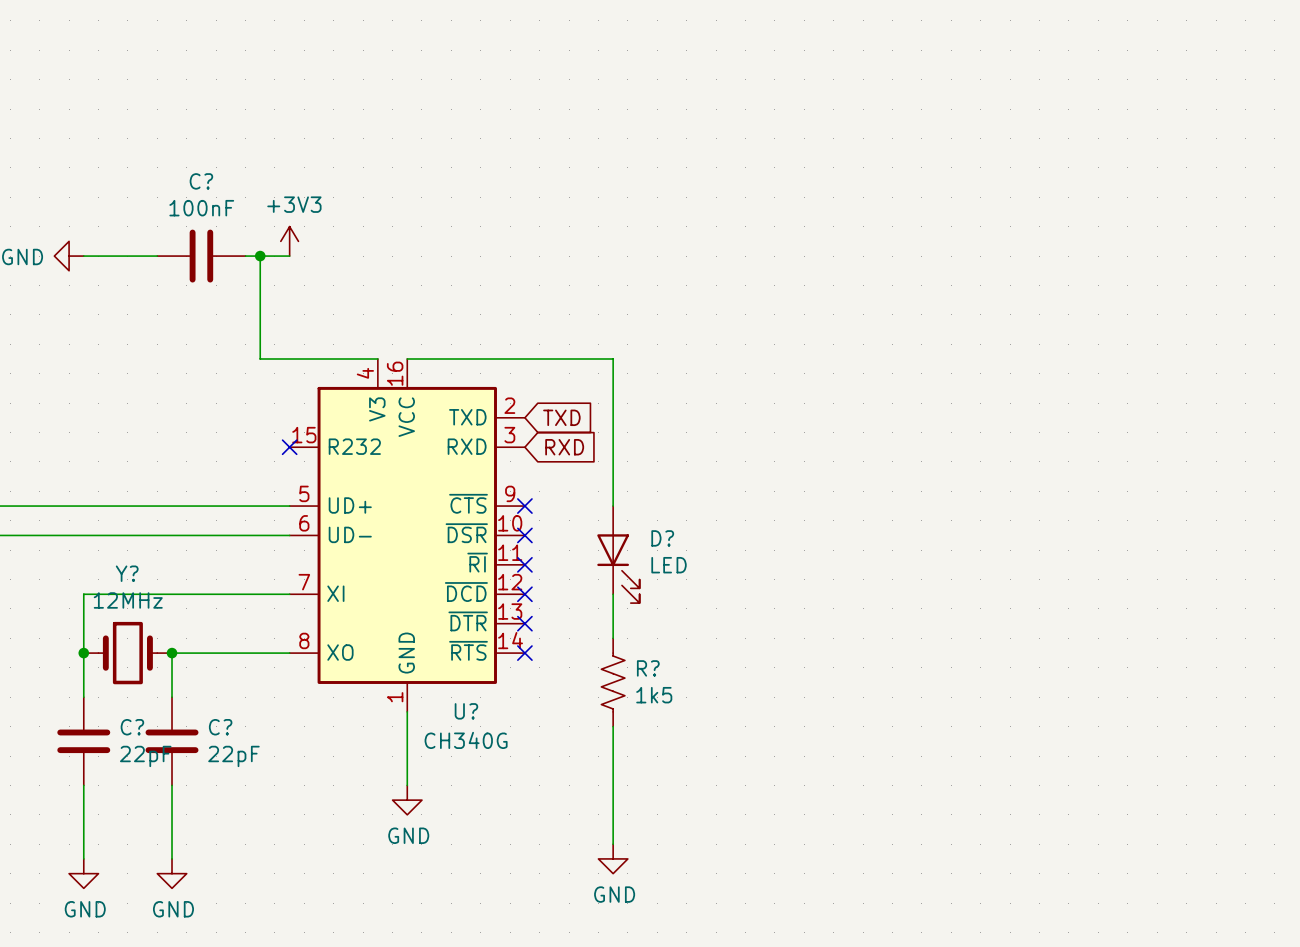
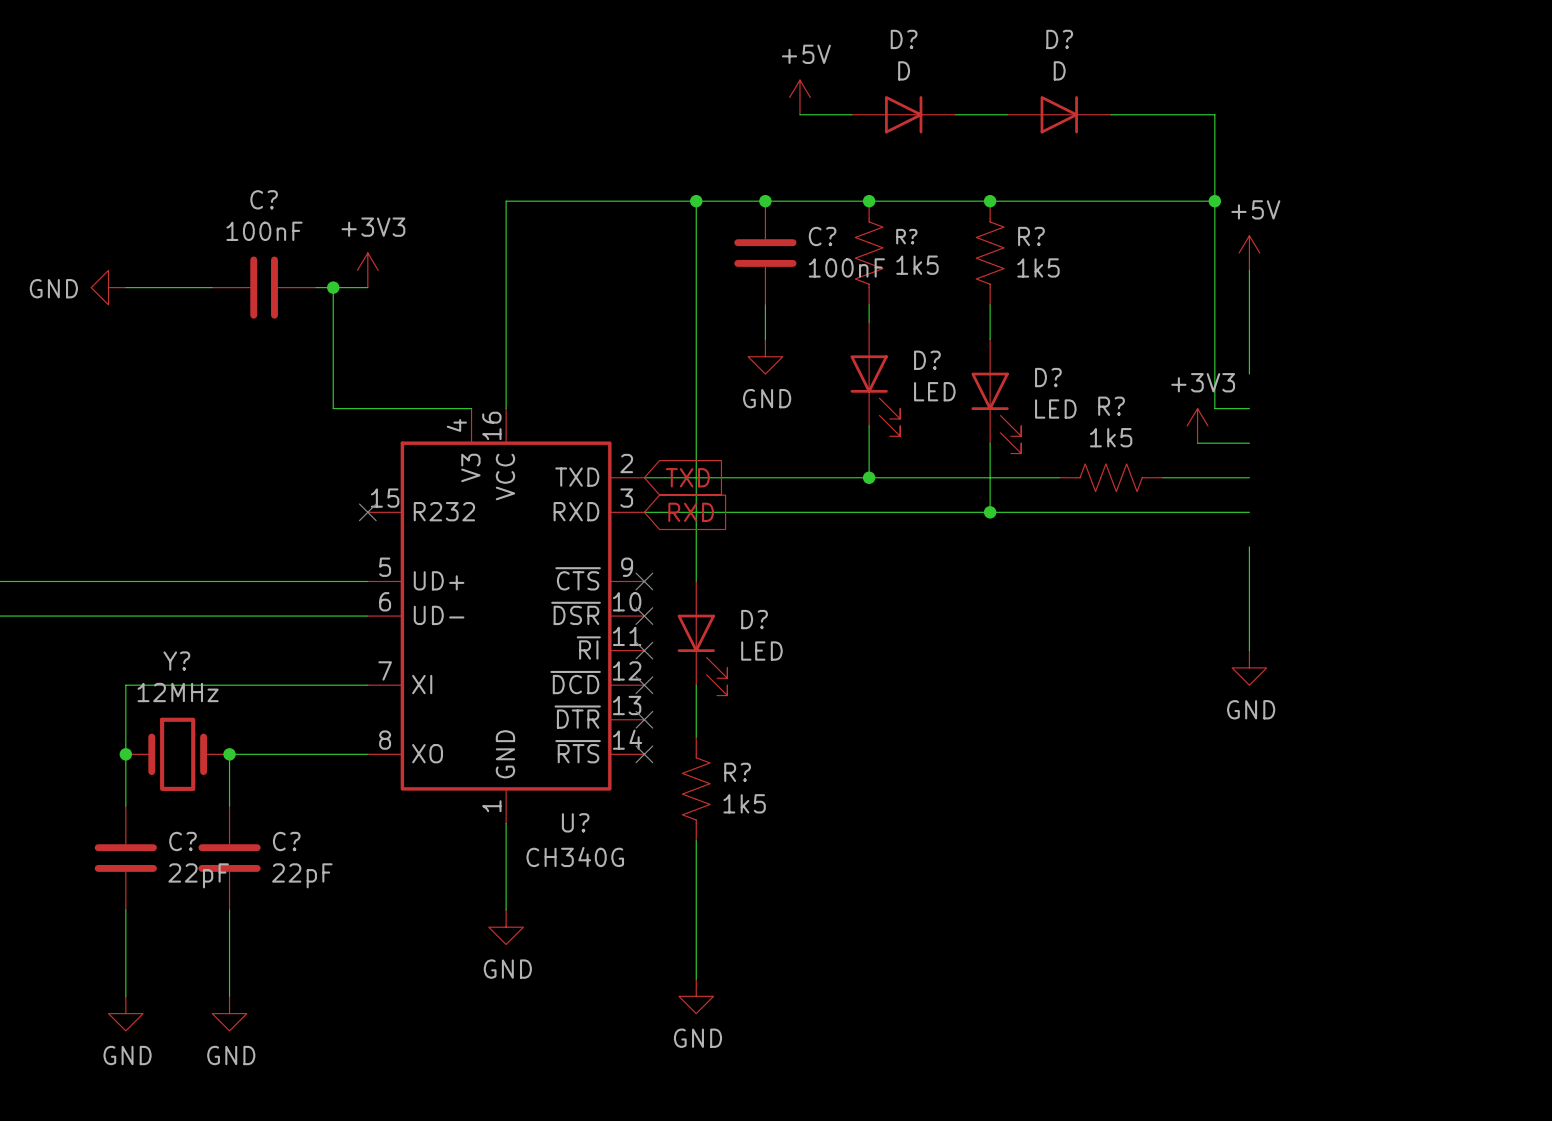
power symbol: none -> +5V (799, 97)
wire: none -> (799, 114) (851, 114)
D?: none -> D (903, 114)
wire: none -> (955, 114) (1007, 114)
D?: none -> D (1059, 114)
wire: none -> (1111, 114) (1214, 114) (1214, 408) (1249, 408)
wire: none -> (696, 201) (696, 581)
junction: none -> (696, 201)
junction: none -> (765, 201)
junction: none -> (869, 201)
junction: none -> (990, 201)
junction: none -> (1214, 201)
C?: none -> 100nF (765, 253)
R?: none -> 1k5 (869, 253)
R?: none -> 1k5 (990, 253)
power symbol: none -> +5V (1249, 253)
wire: none -> (1249, 270) (1249, 374)
wire: none -> (765, 304) (765, 339)
wire: none -> (869, 304) (869, 322)
wire: none -> (990, 304) (990, 339)
power symbol: none -> GND (765, 356)
D?: none -> LED (875, 379)
D?: none -> LED (996, 396)
wire: (407, 358) (613, 358) (613, 506) -> (506, 408) (506, 201) (1214, 201)
wire: none -> (869, 425) (869, 477)
power symbol: none -> +3V3 (1197, 425)
wire: none -> (990, 443) (990, 512)
wire: none -> (1197, 443) (1249, 443)
wire: none -> (644, 477) (1059, 477)
junction: none -> (869, 477)
R?: none -> 1k5 (1111, 477)
wire: none -> (1162, 477) (1249, 477)
wire: none -> (644, 512) (1249, 512)
junction: none -> (990, 512)
wire: none -> (1249, 546) (1249, 650)
D? position: (618, 554) -> (702, 638)
power symbol: none -> GND (1249, 667)
wire: (613, 594) (613, 638) -> (696, 685) (696, 737)
R? position: (613, 682) -> (696, 788)
wire: (613, 726) (613, 844) -> (696, 840) (696, 979)
power symbol position: GND (613, 858) -> GND (696, 996)

